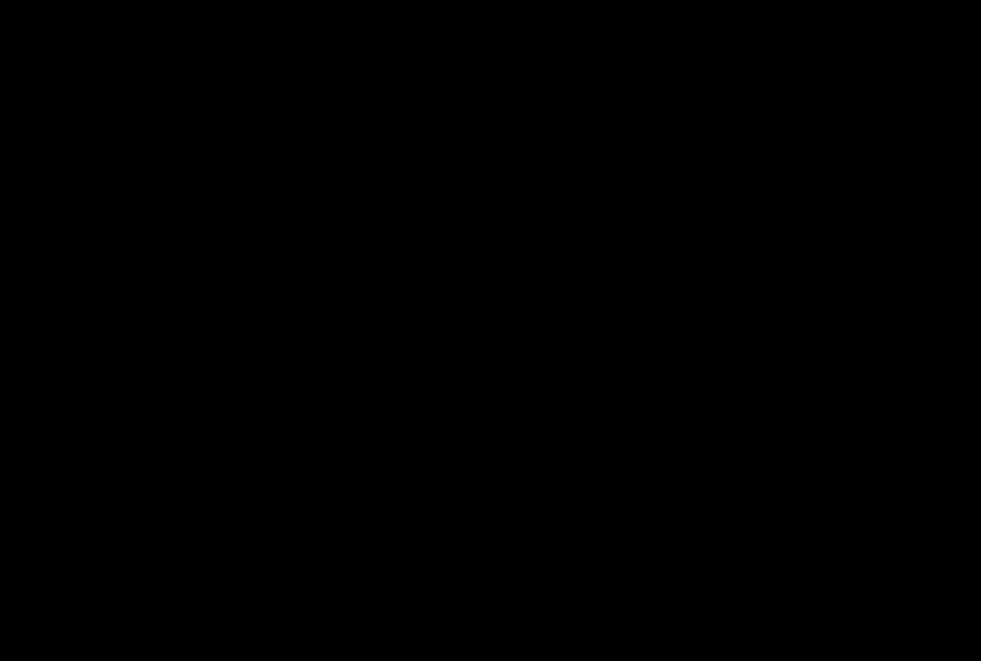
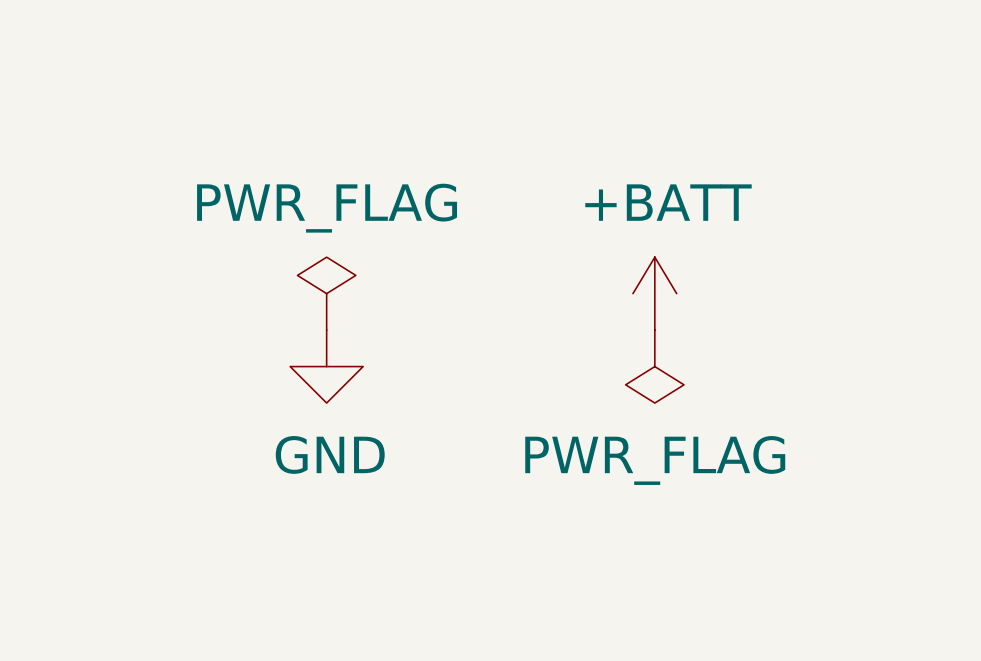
power symbol: none -> PWR_FLAG (326, 293)
power symbol: none -> +BATT (654, 293)
power symbol: none -> GND (326, 366)
power symbol: none -> PWR_FLAG (654, 366)

